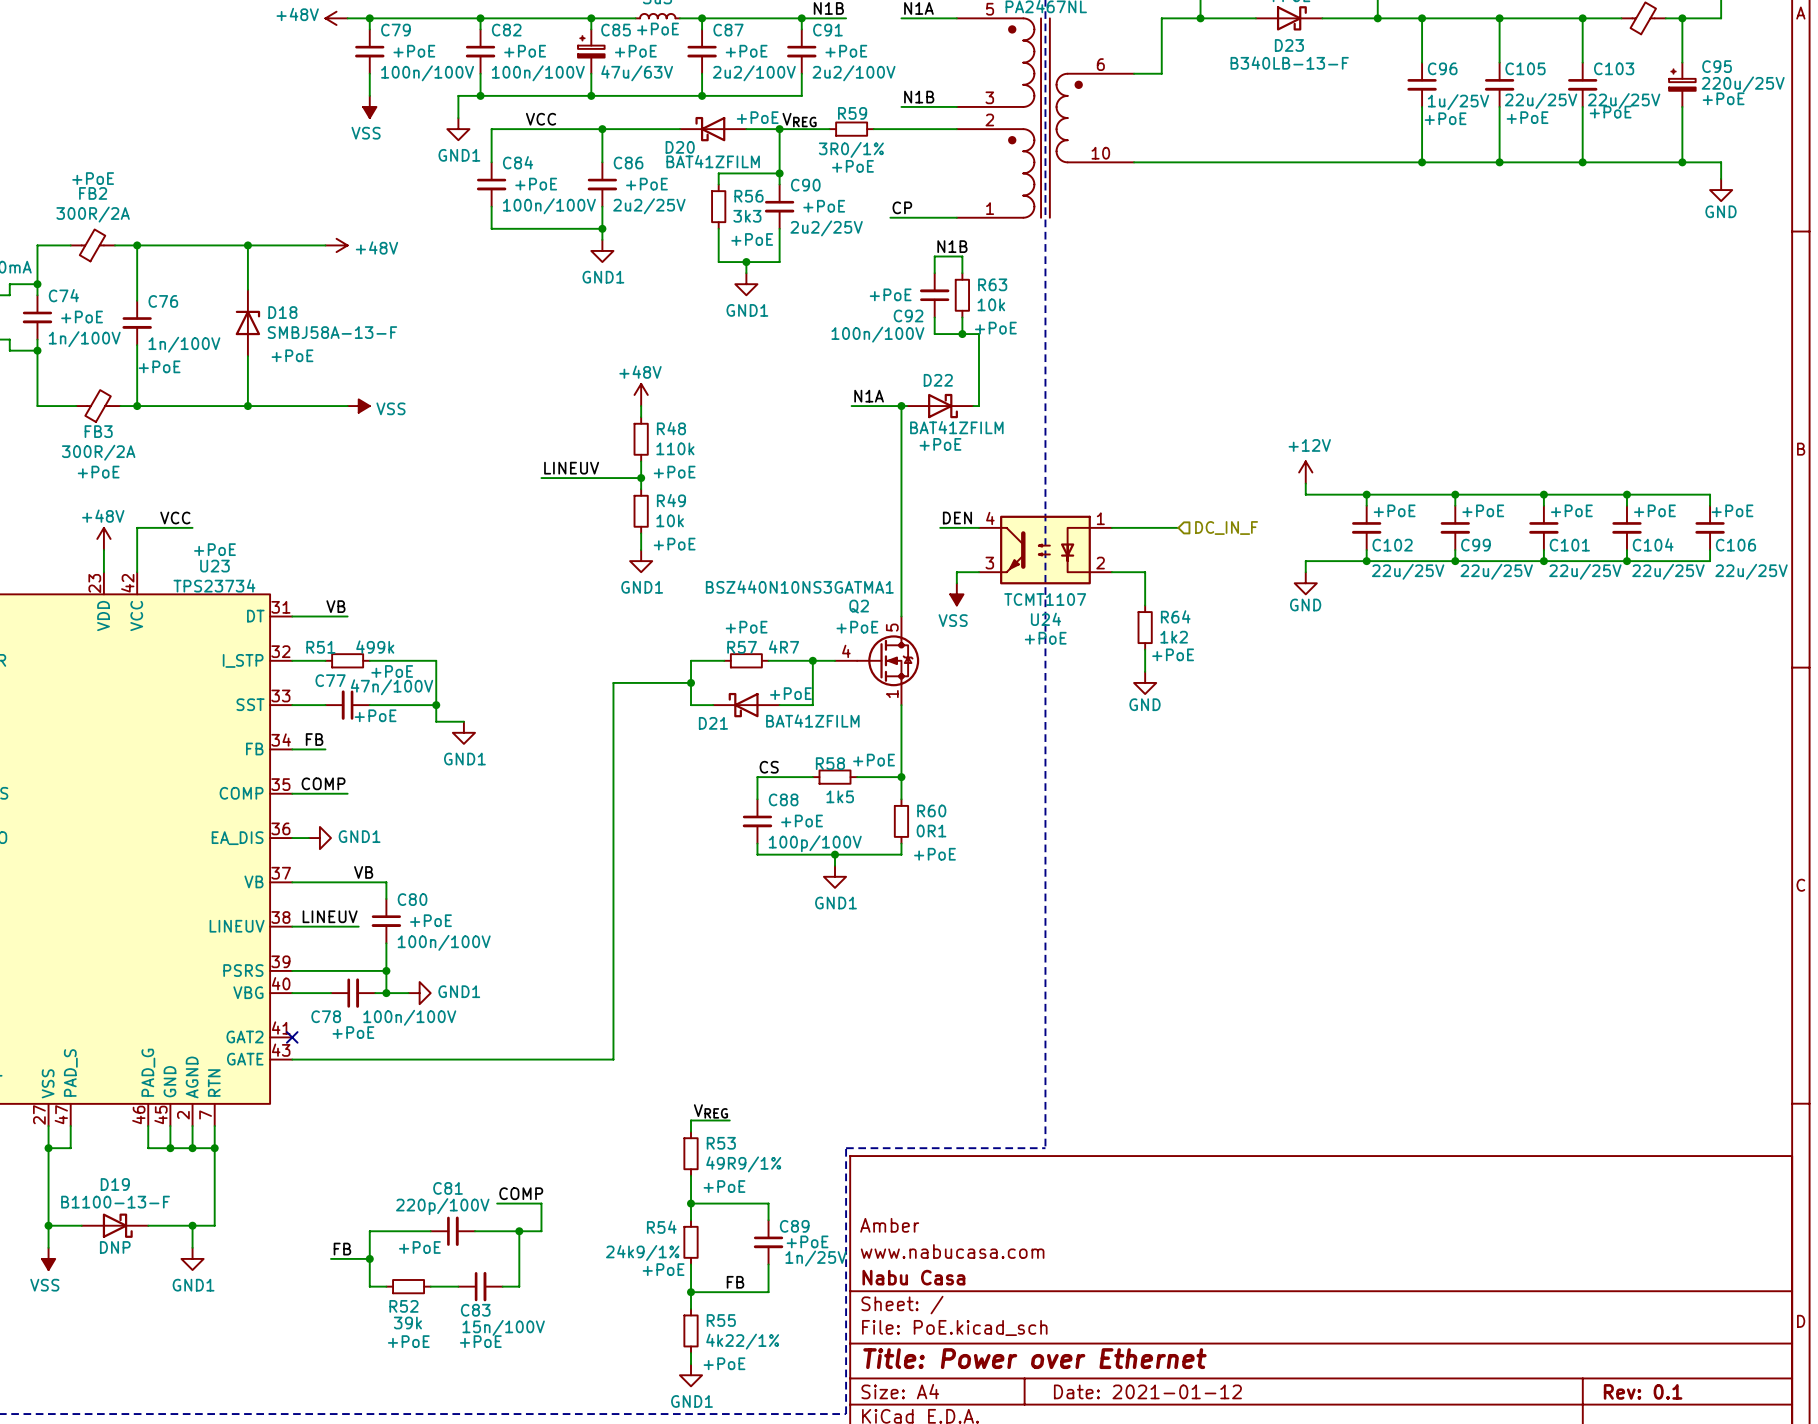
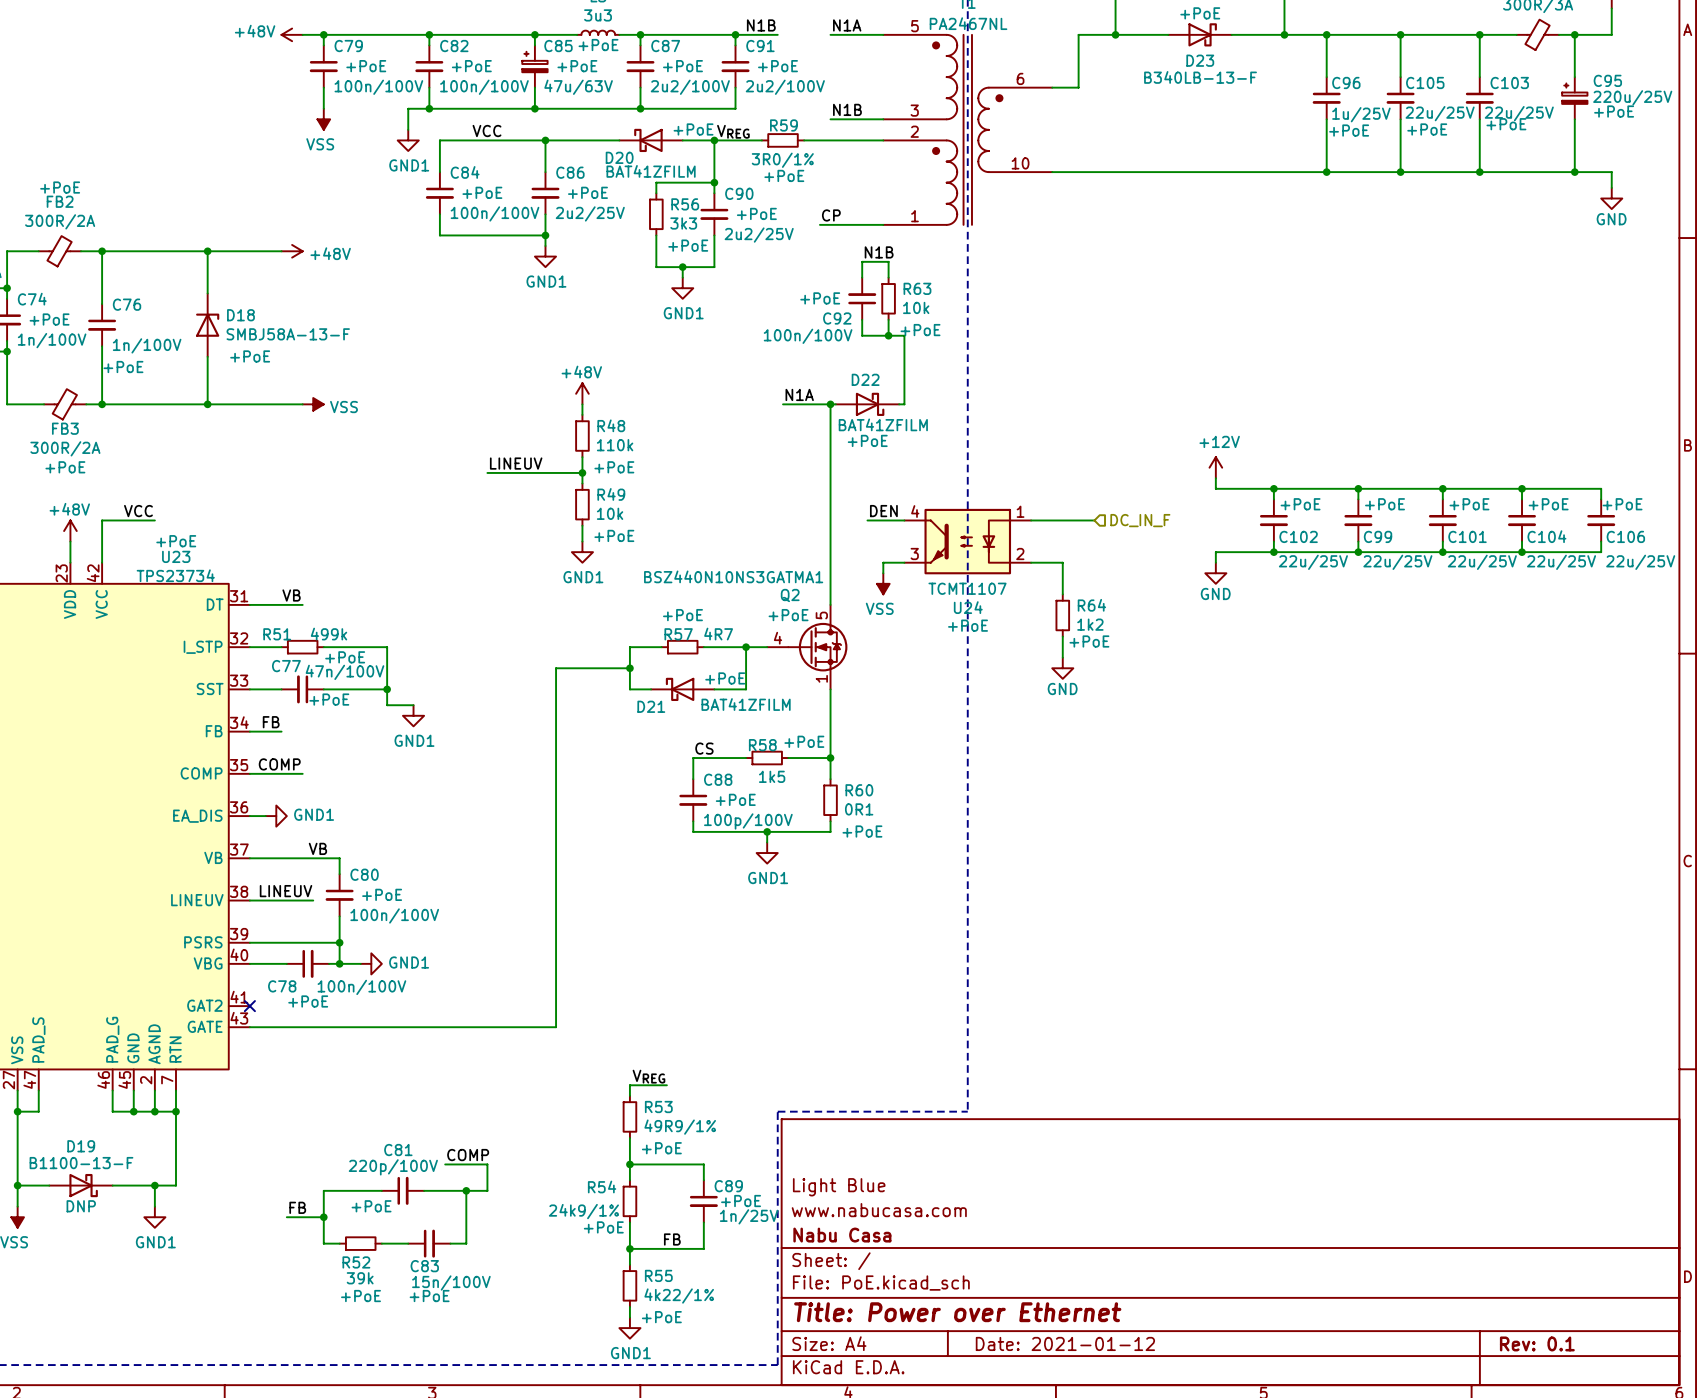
title block: Amber (889, 1225) -> Light Blue (839, 1187)

